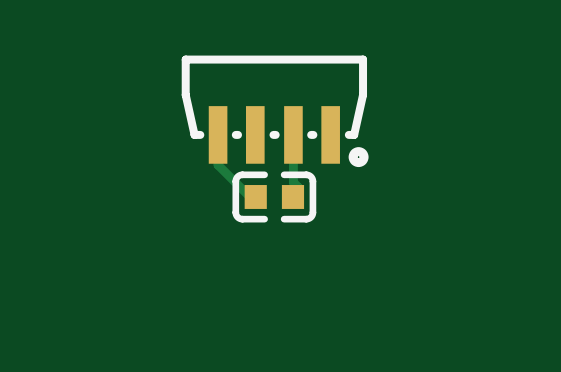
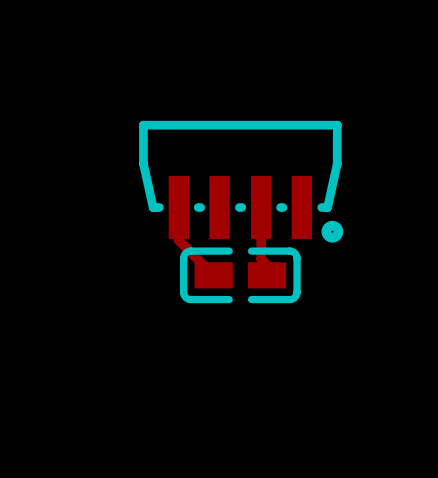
part footprint: [232, 171, 317, 223] -> [180, 247, 301, 304]

